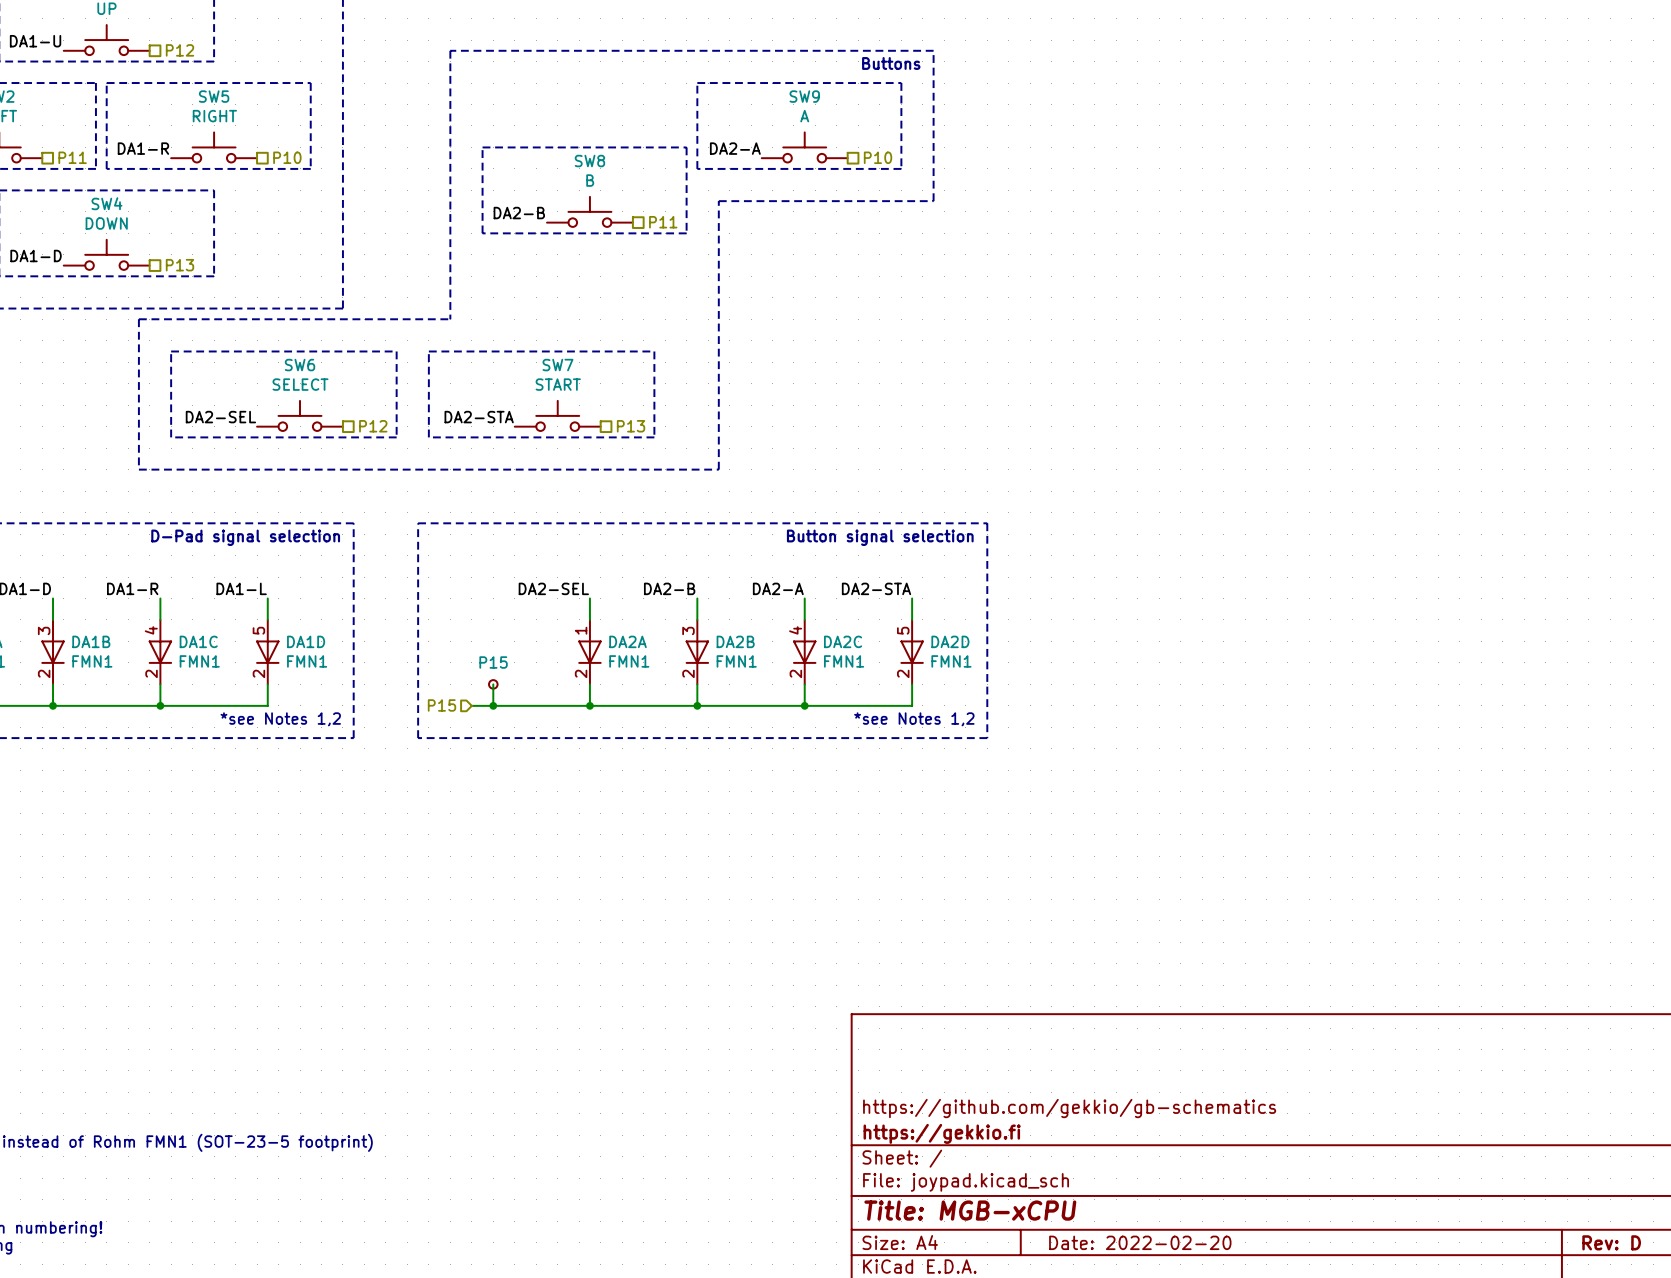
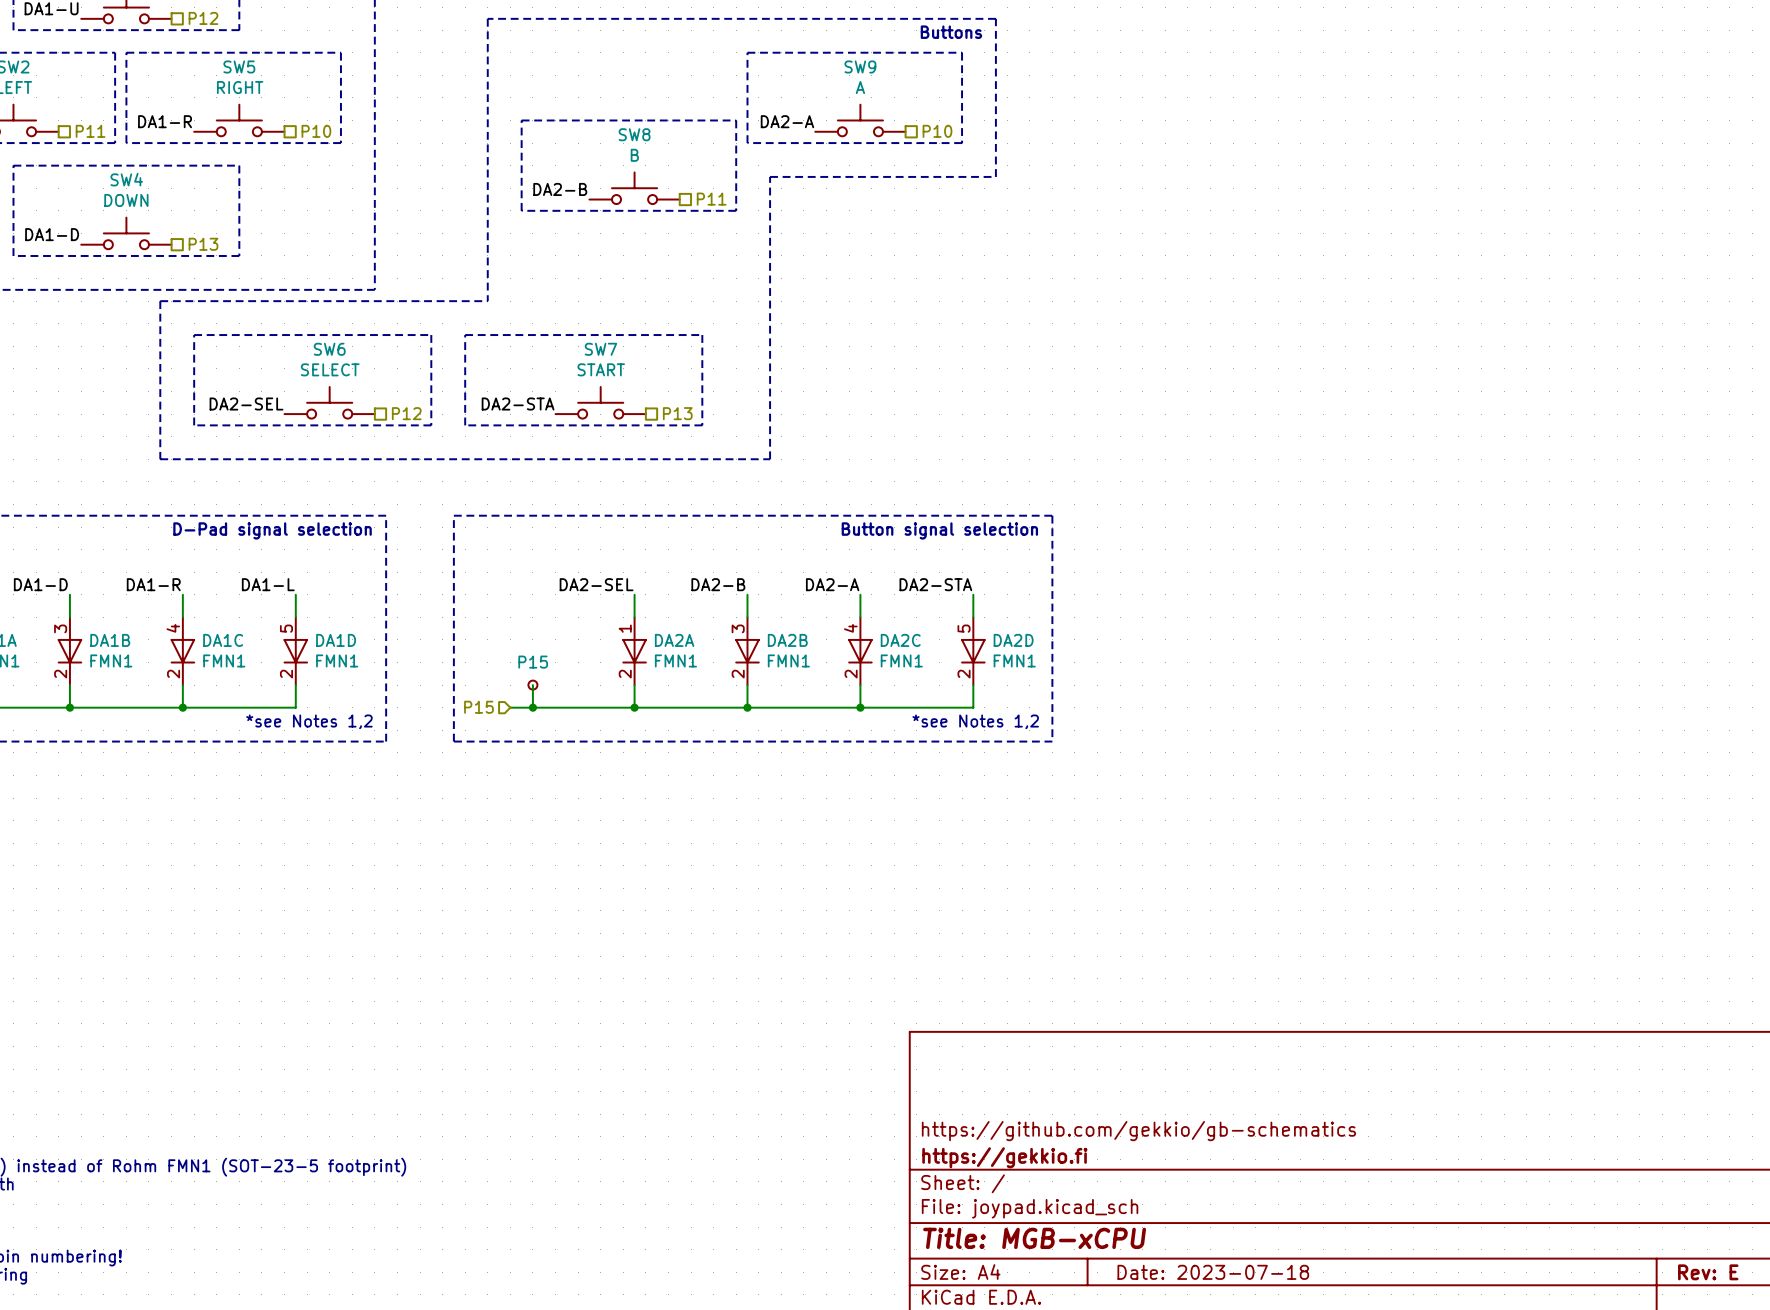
title block: Date: 2022-02-20 (1140, 1242) -> Date: 2023-07-18 (1213, 1272)
title block: Rev: D (1611, 1242) -> Rev: E (1708, 1272)

